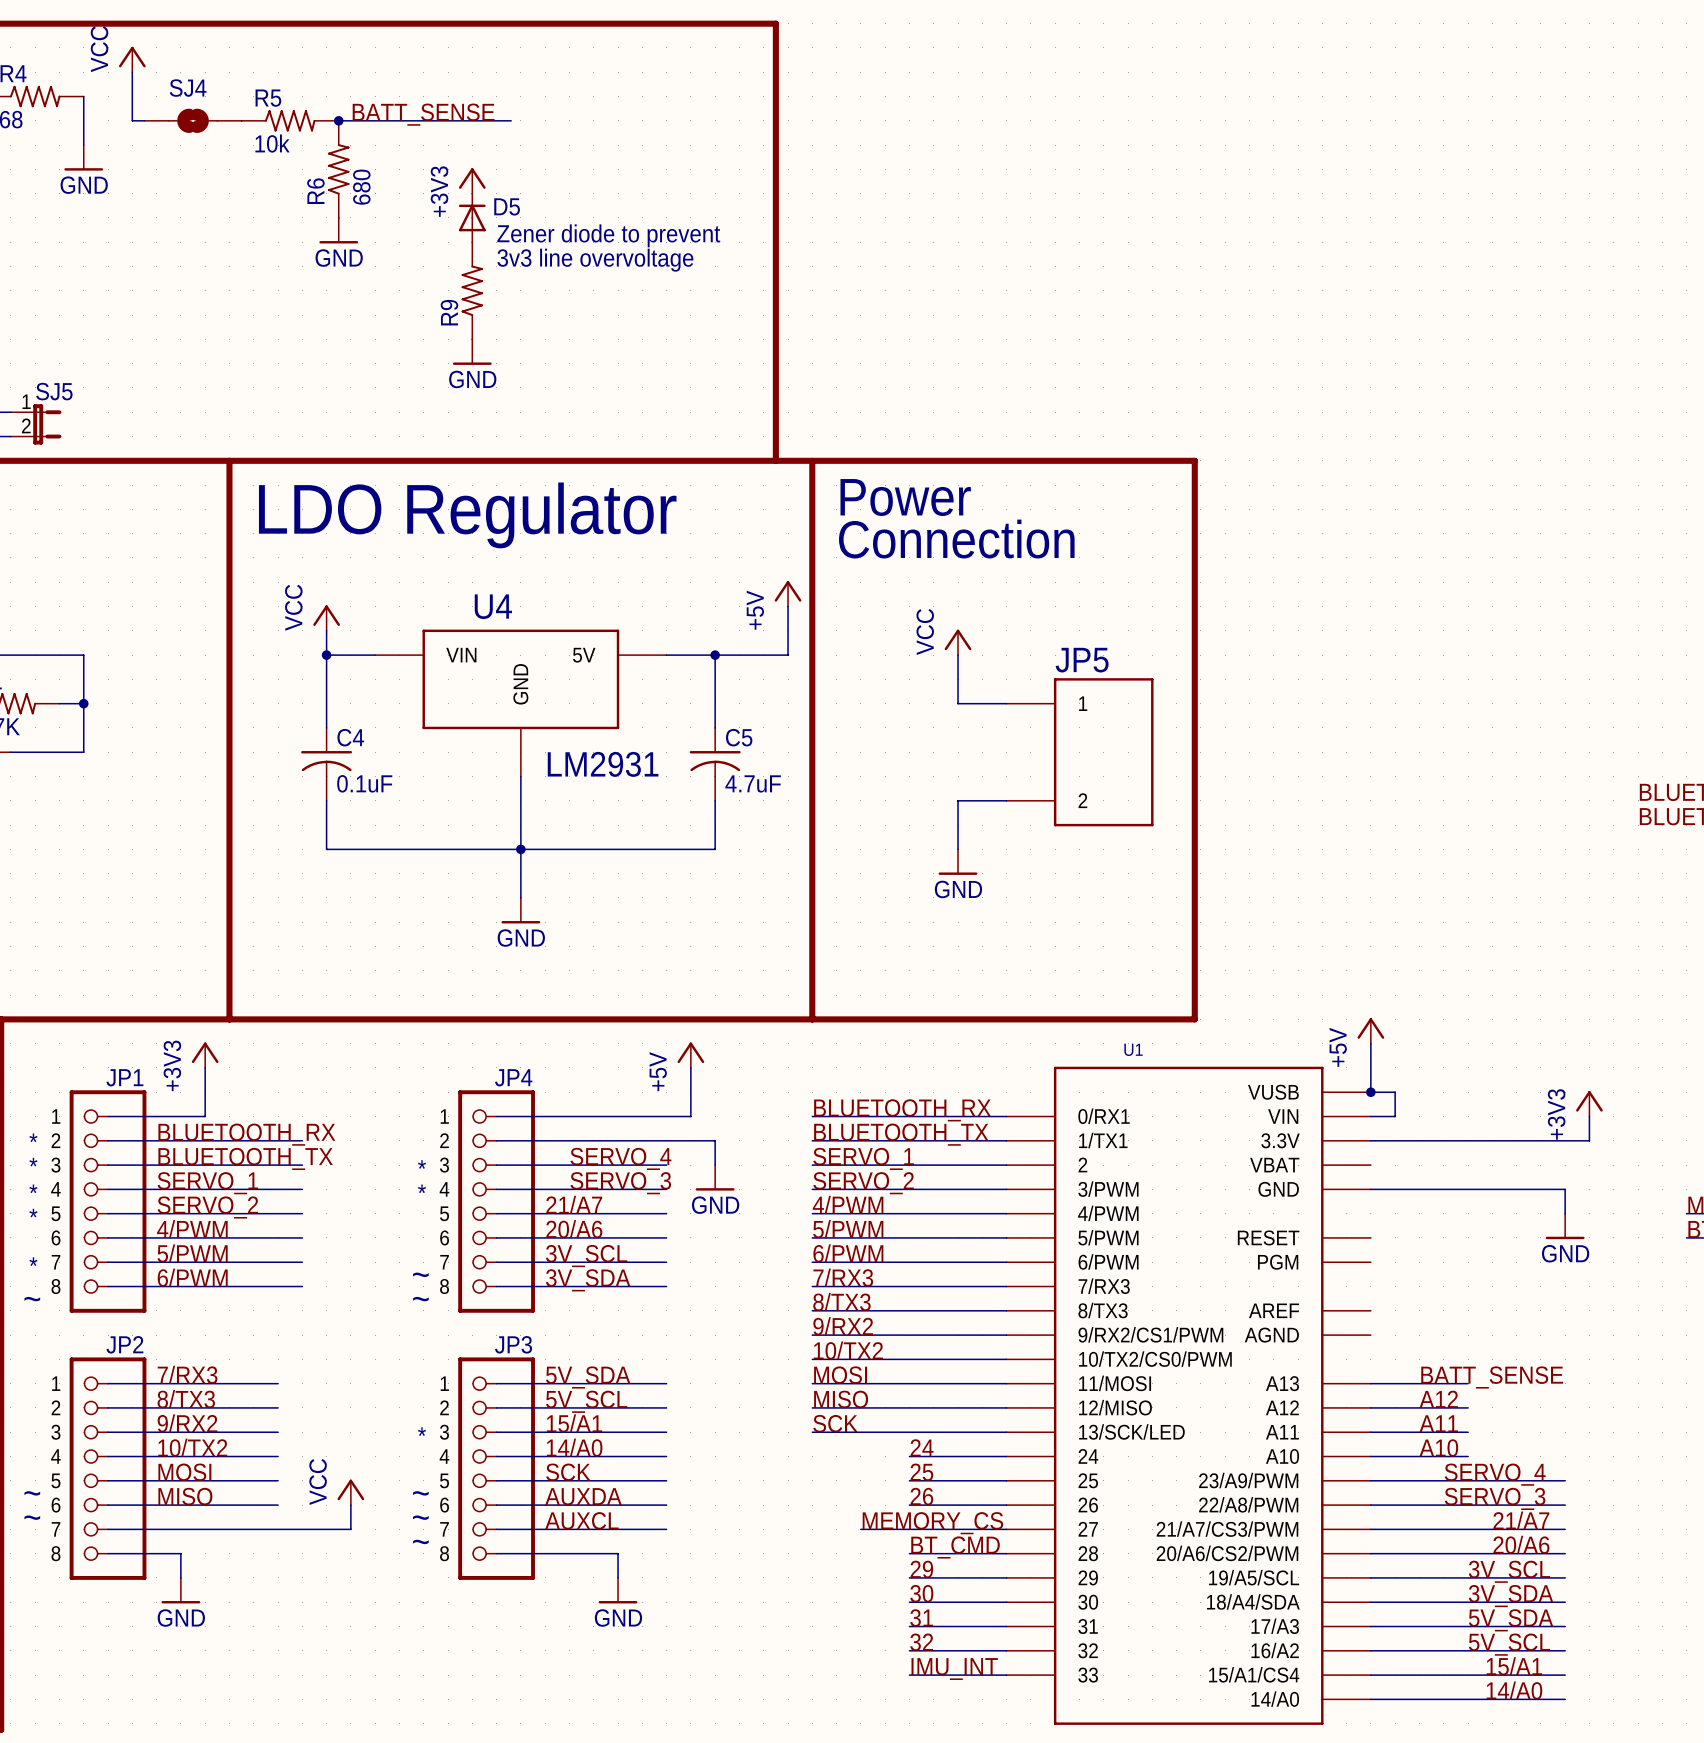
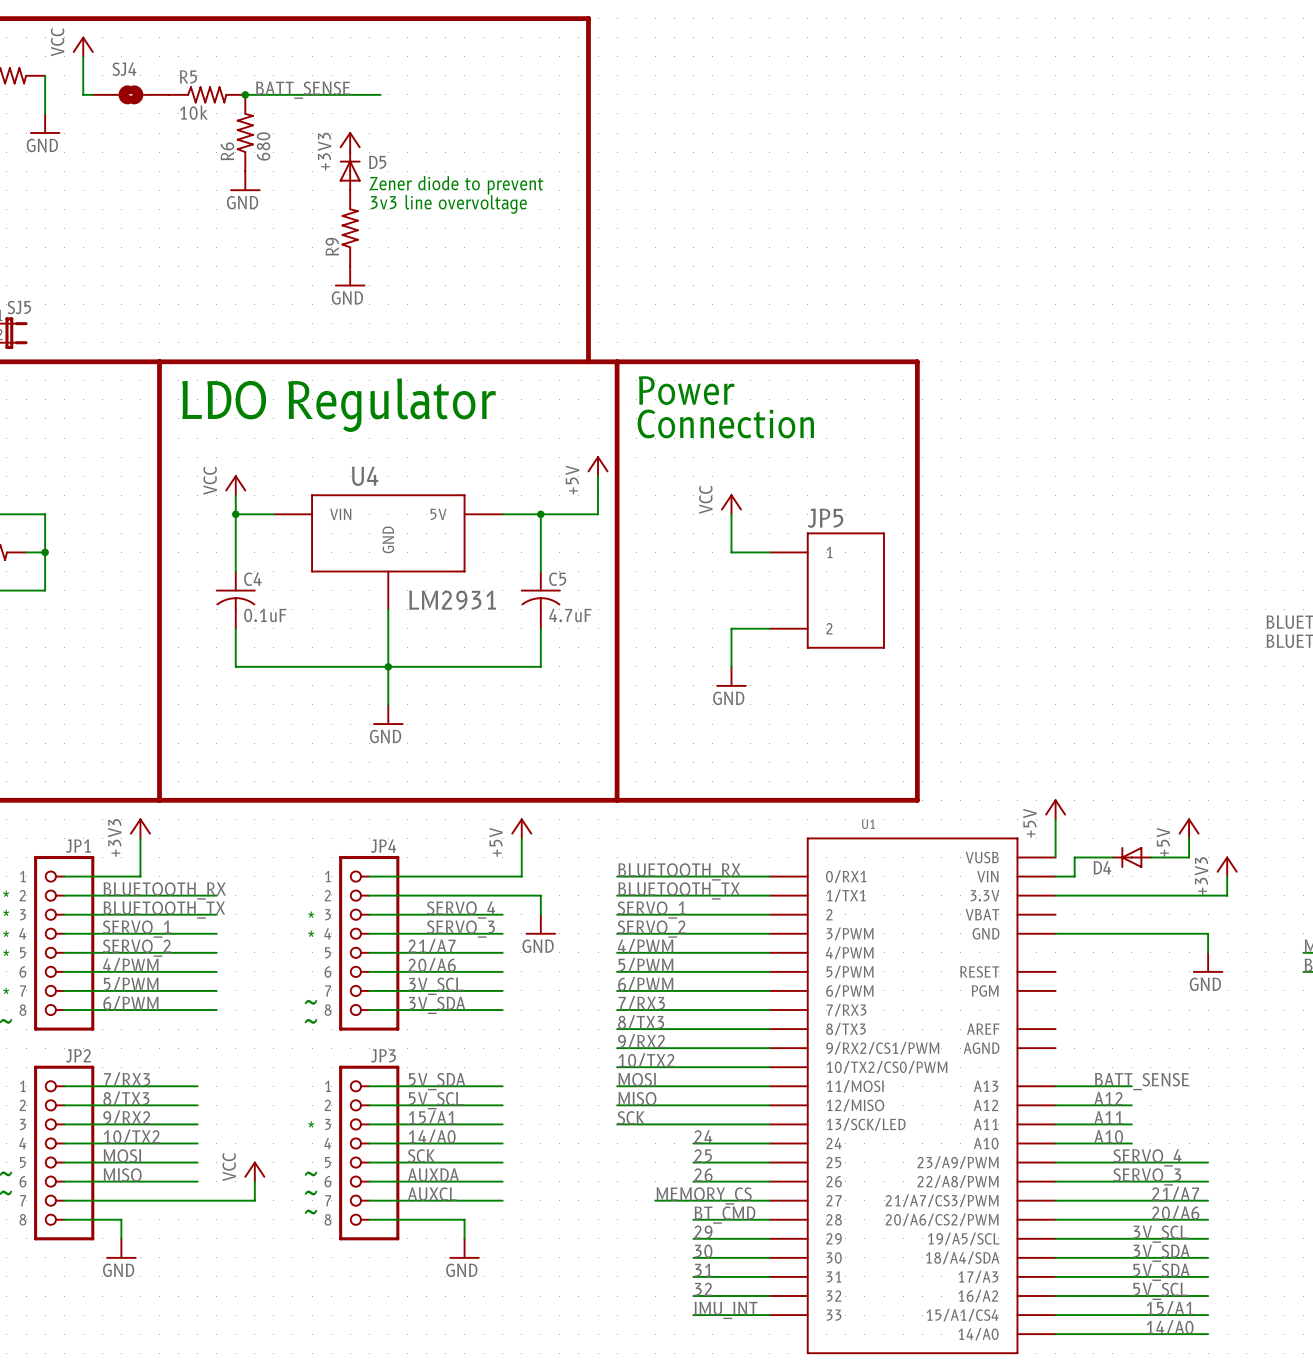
power symbol: none -> +5V (1189, 828)
wire: none -> (1189, 838) (1189, 857) (1150, 857)
wire: (1370, 1092) (1395, 1092) -> (1112, 857) (1074, 857)
junction: (1370, 1092) -> none
D4: none -> (1131, 857)

